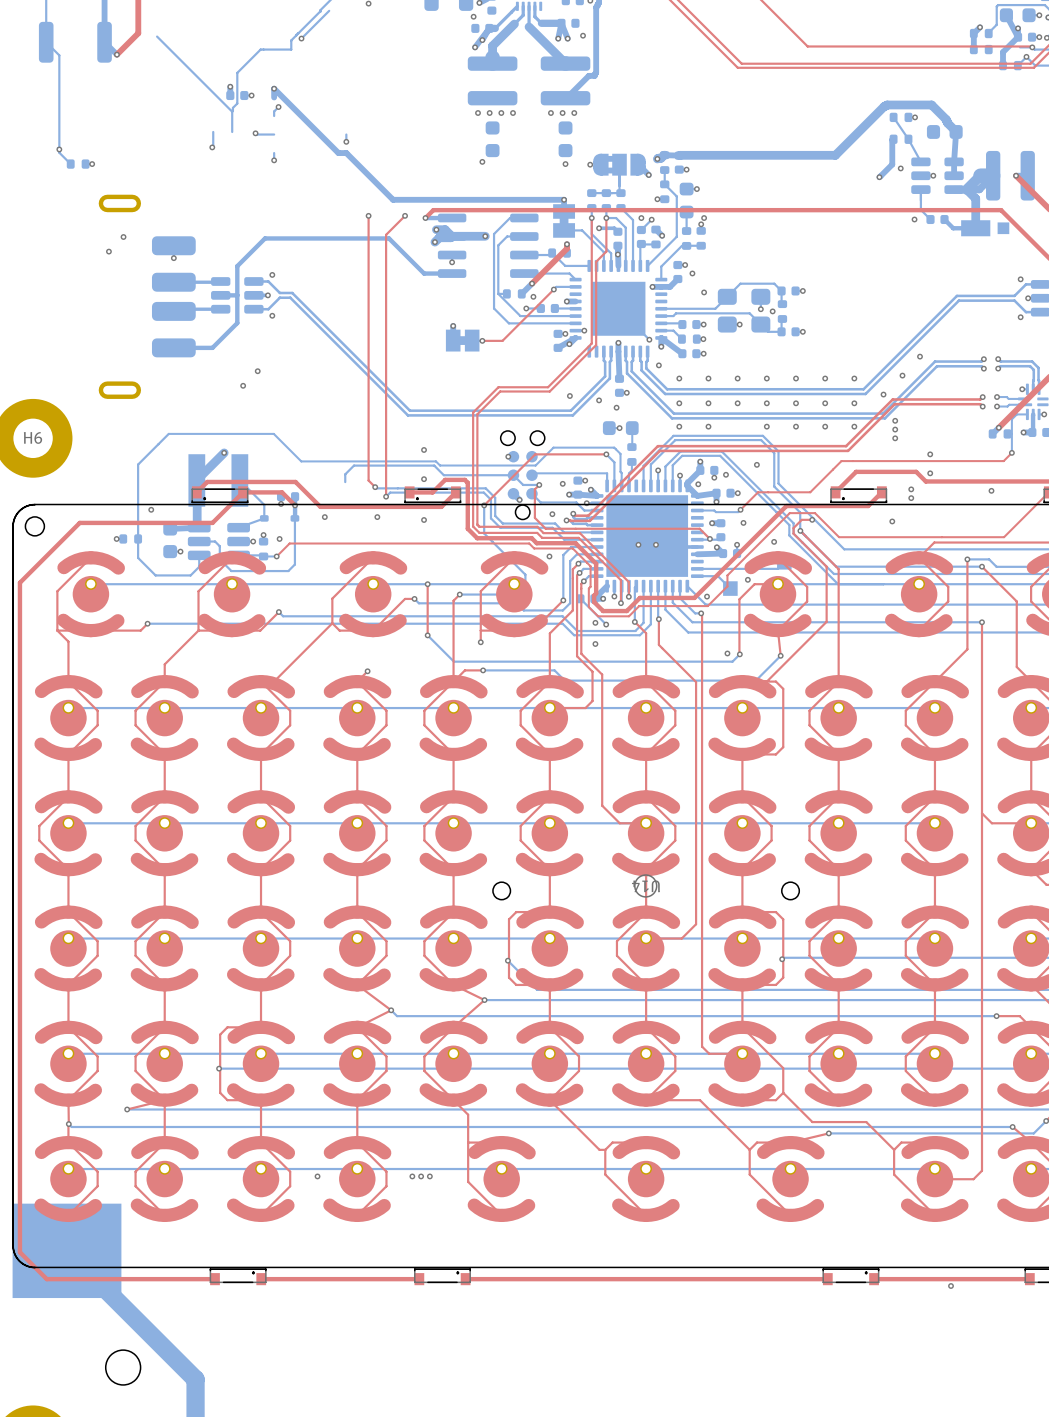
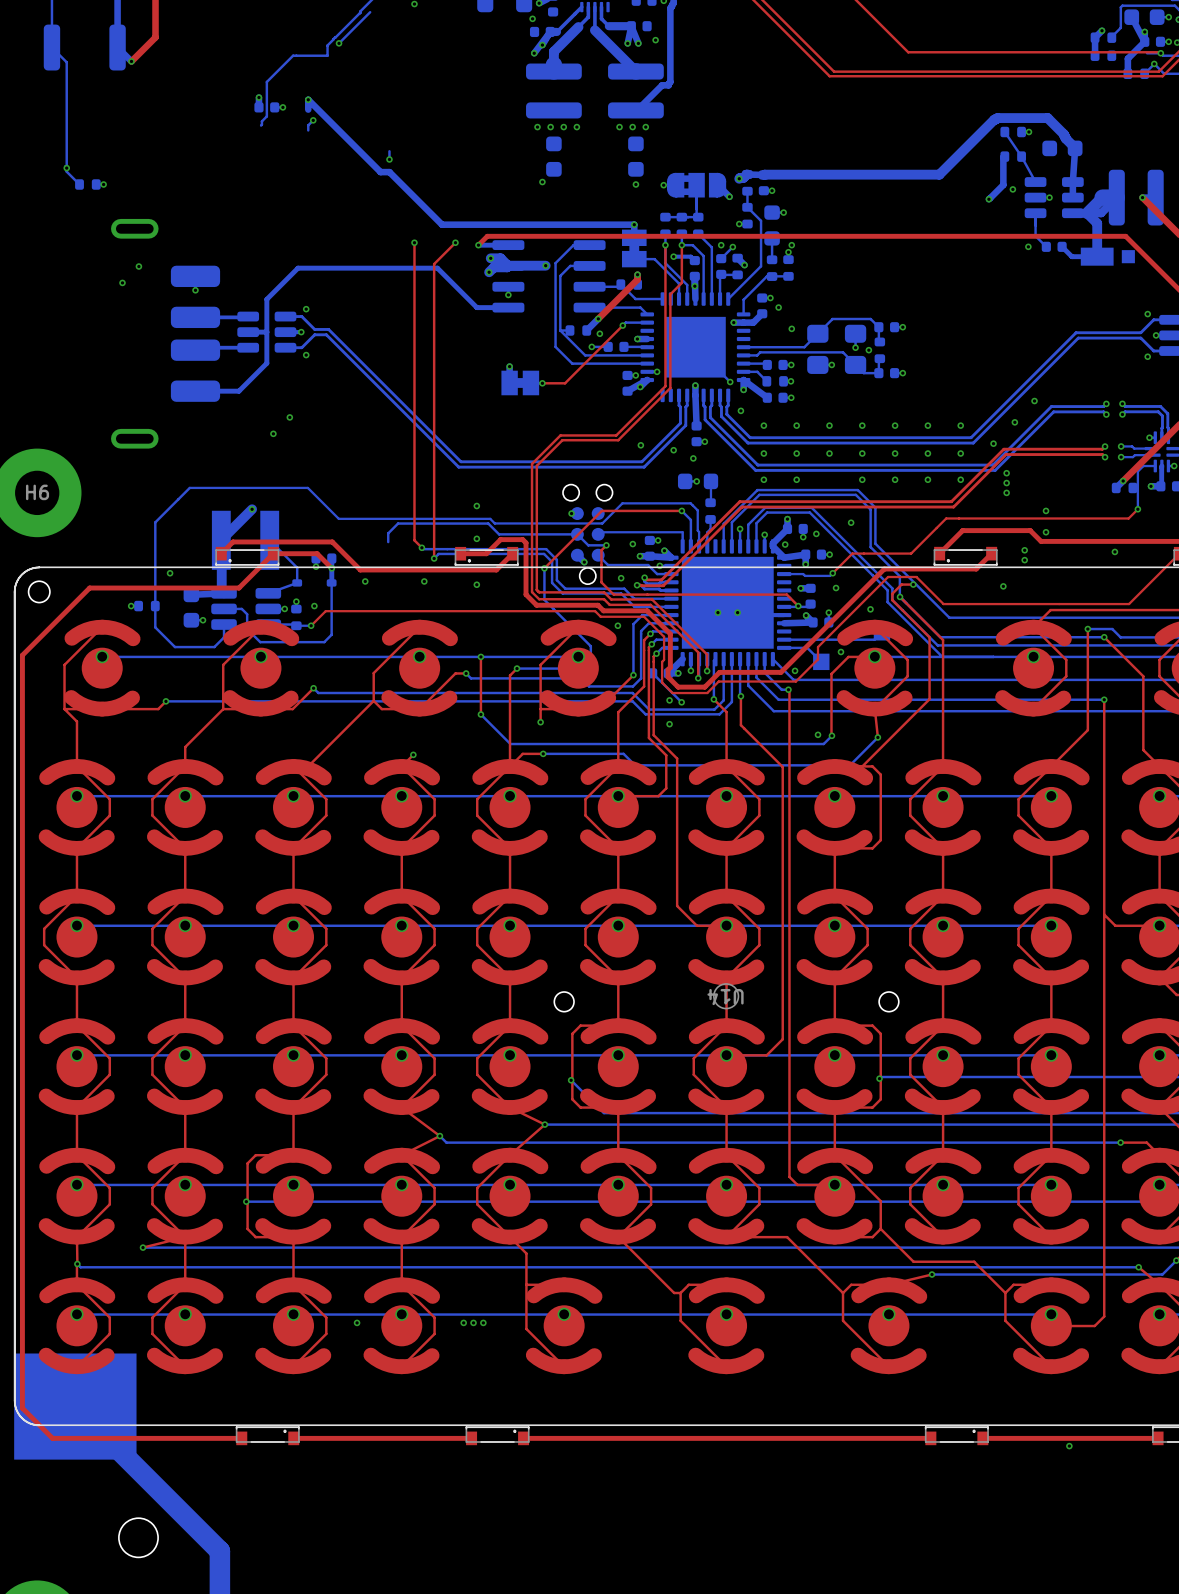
bottom track: (157, 36) (232, 111) (232, 131) -> none
bottom track: (213, 131) (212, 147) -> none
bottom track: (255, 133) (274, 134) -> none
via: (255, 133) -> none
via: (212, 147) -> none
bottom track: (274, 153) (274, 160) -> none
via: (274, 160) -> none

